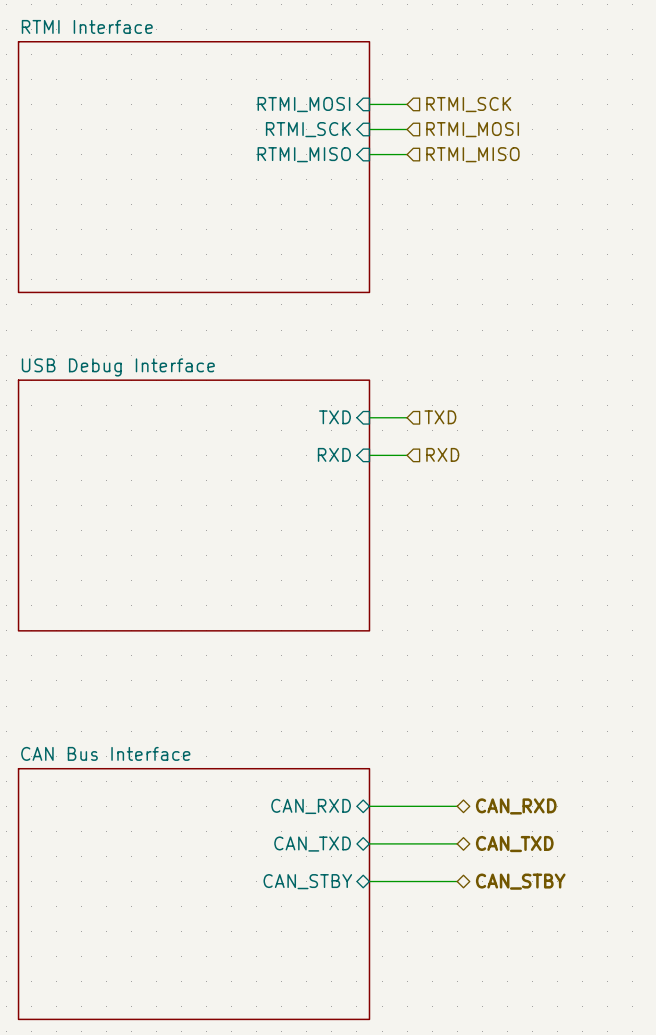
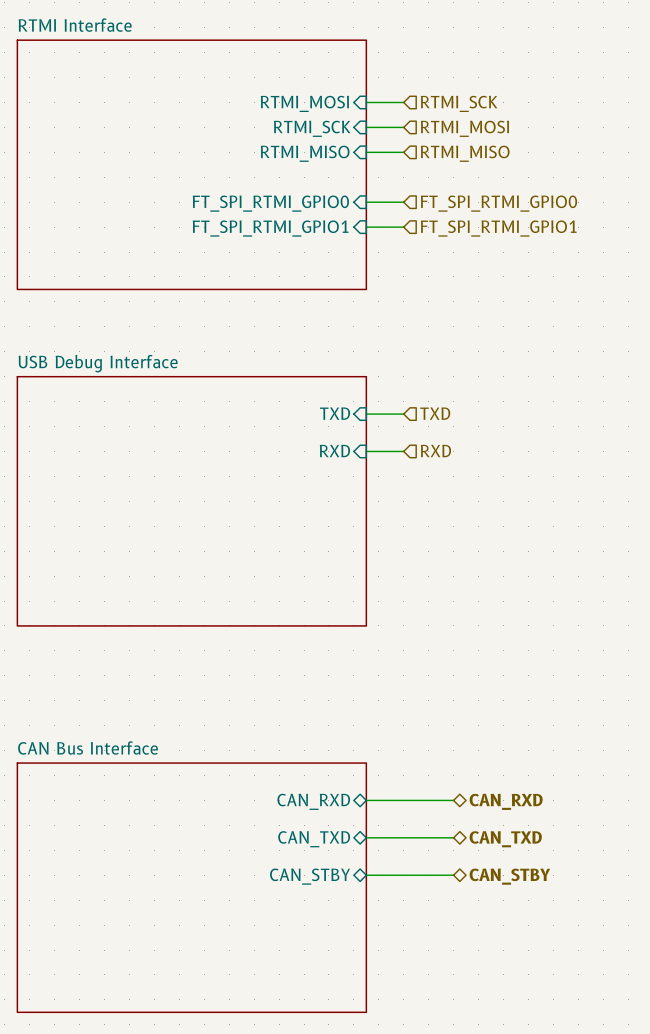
sheet pin: none -> FT_SPI_RTMI_GPIO0 (270, 203)
wire: none -> (366, 202) (403, 202)
hierarchical label: none -> FT_SPI_RTMI_GPIO0 (498, 203)
sheet pin: none -> FT_SPI_RTMI_GPIO1 (270, 228)
wire: none -> (366, 227) (403, 227)
hierarchical label: none -> FT_SPI_RTMI_GPIO1 (498, 228)

